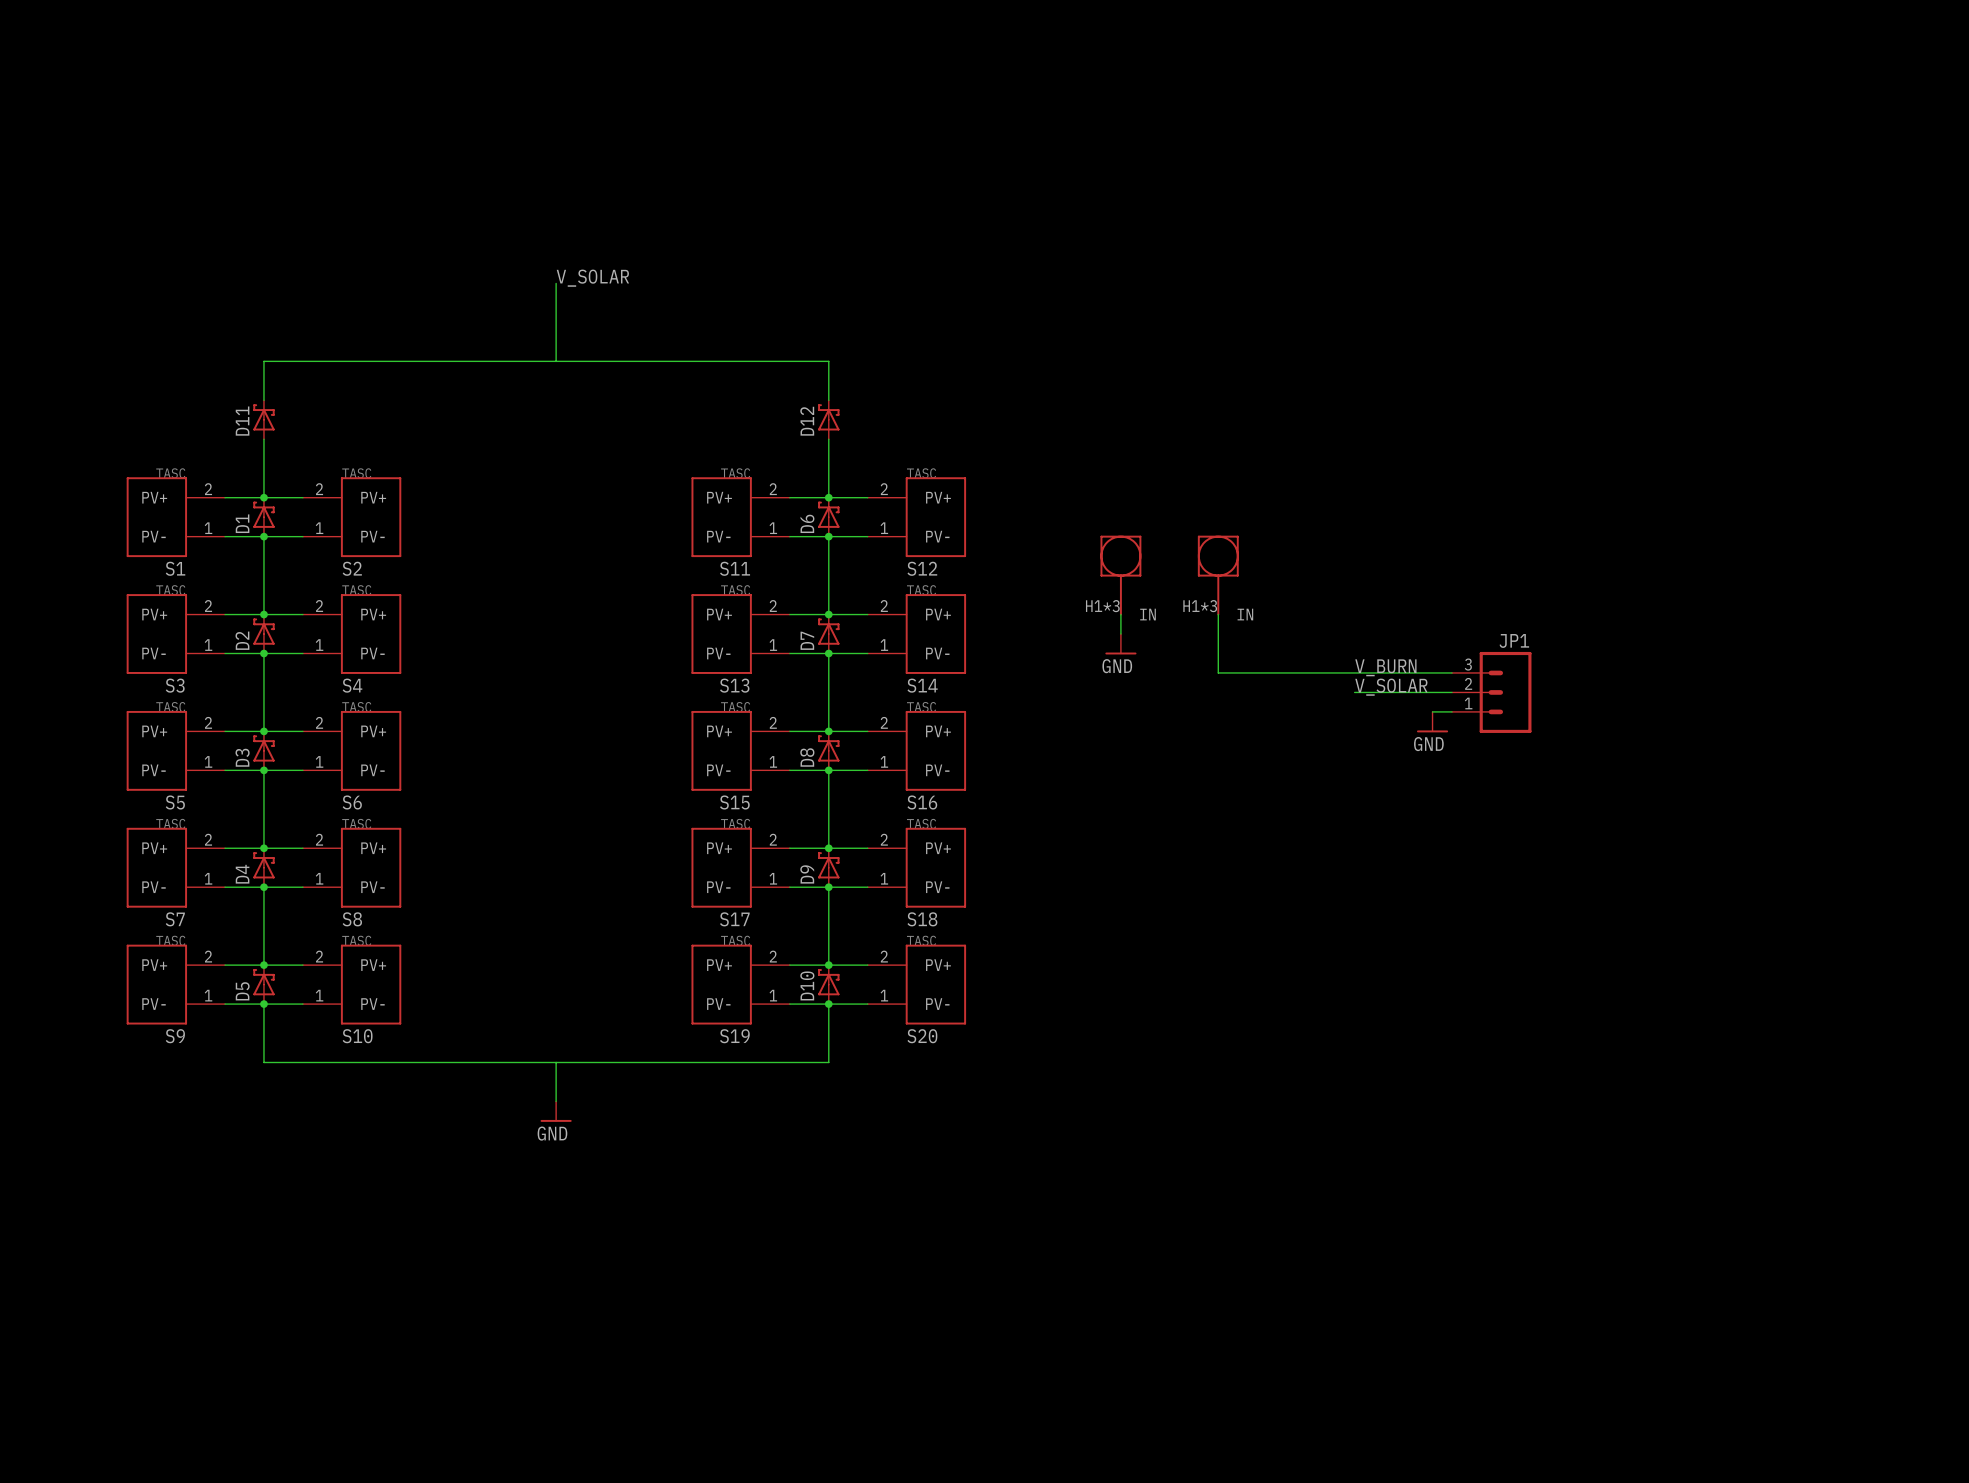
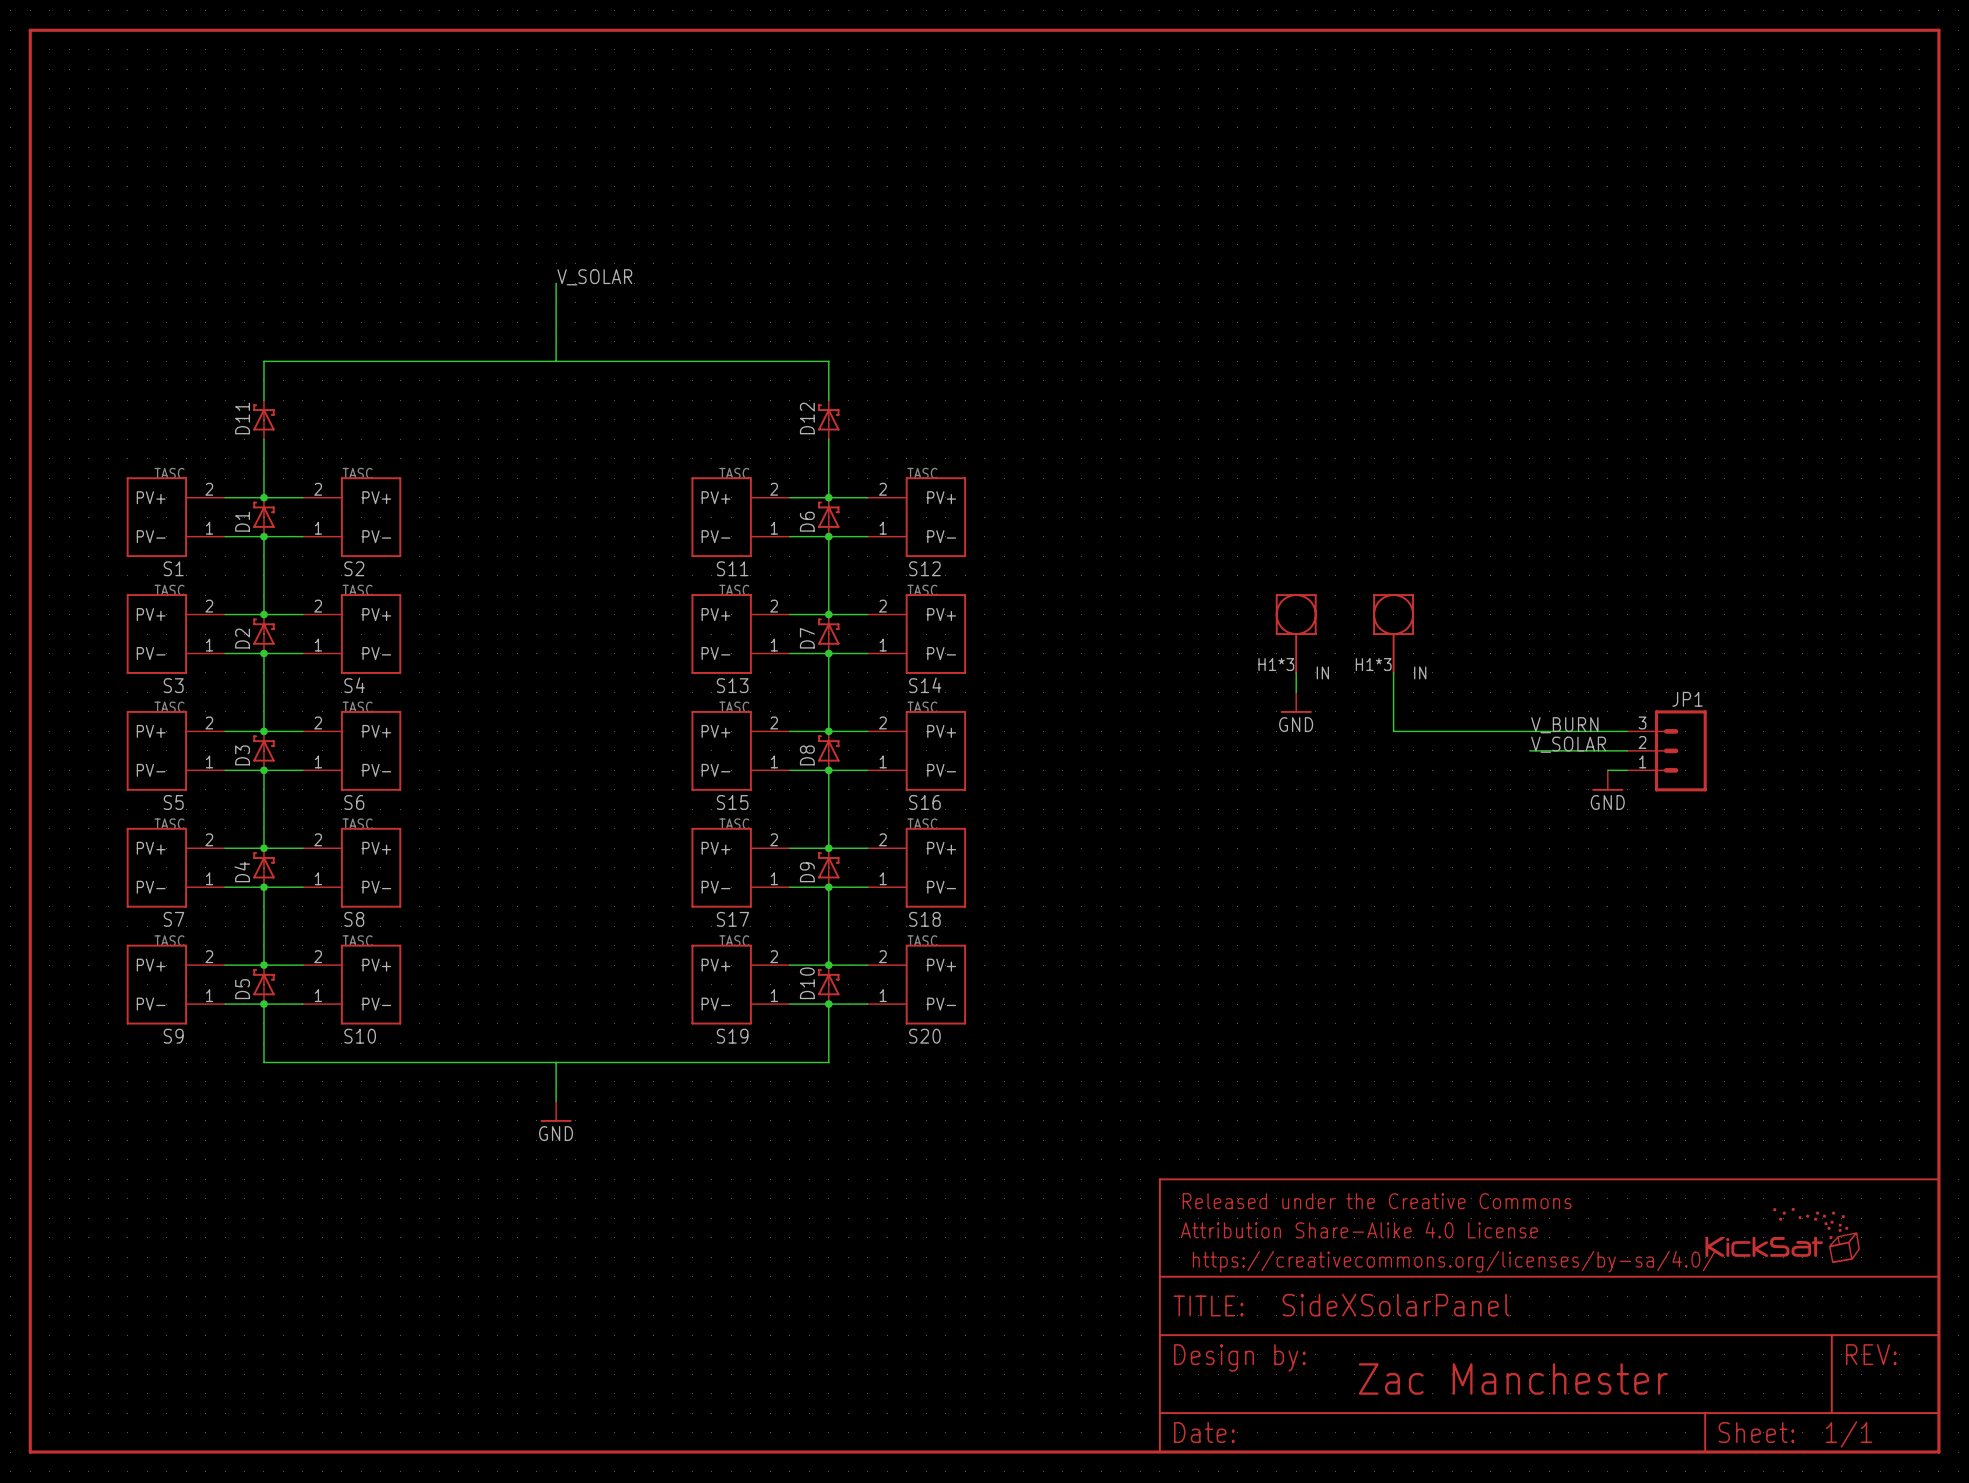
part: (1120, 575) -> none
part: (1218, 575) -> none
wire: (1120, 614) (1120, 634) -> (1296, 672) (1296, 692)
wire: (1218, 614) (1218, 672) (1452, 672) -> (1393, 672) (1393, 731) (1627, 731)
part: none -> (1296, 634)
part: none -> (1393, 634)
power symbol: GND (1120, 644) -> none
label position: V_BURN (1385, 667) -> V_BURN (1564, 725)
label position: V_SOLAR (1391, 687) -> V_SOLAR (1568, 744)
wire: (1354, 692) (1452, 692) -> (1529, 750) (1627, 750)
JP1 position: (1491, 692) -> (1667, 750)
power symbol: none -> GND (1296, 702)
wire: (1432, 711) (1452, 711) -> (1607, 770) (1627, 770)
power symbol: GND (1432, 722) -> none
part: none -> (984, 741)
power symbol: none -> GND (1607, 780)
part: none -> (1782, 1235)
part: none -> (1549, 1315)
text: none -> Zac Manchester (1513, 1378)

